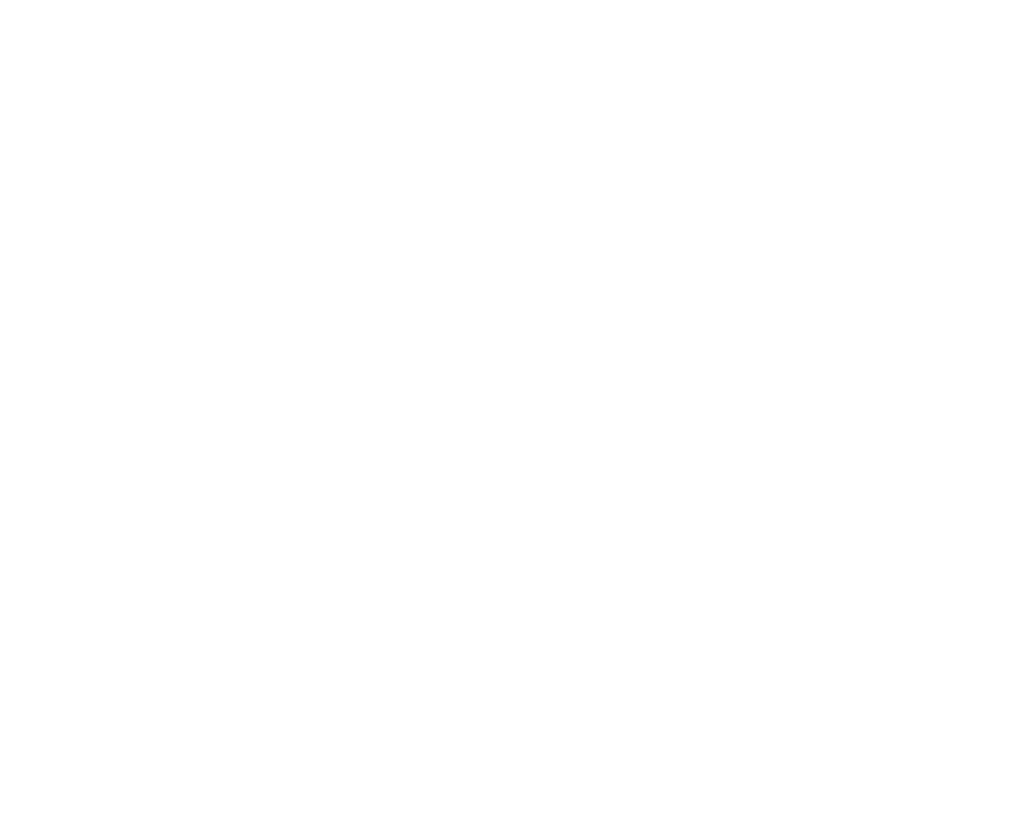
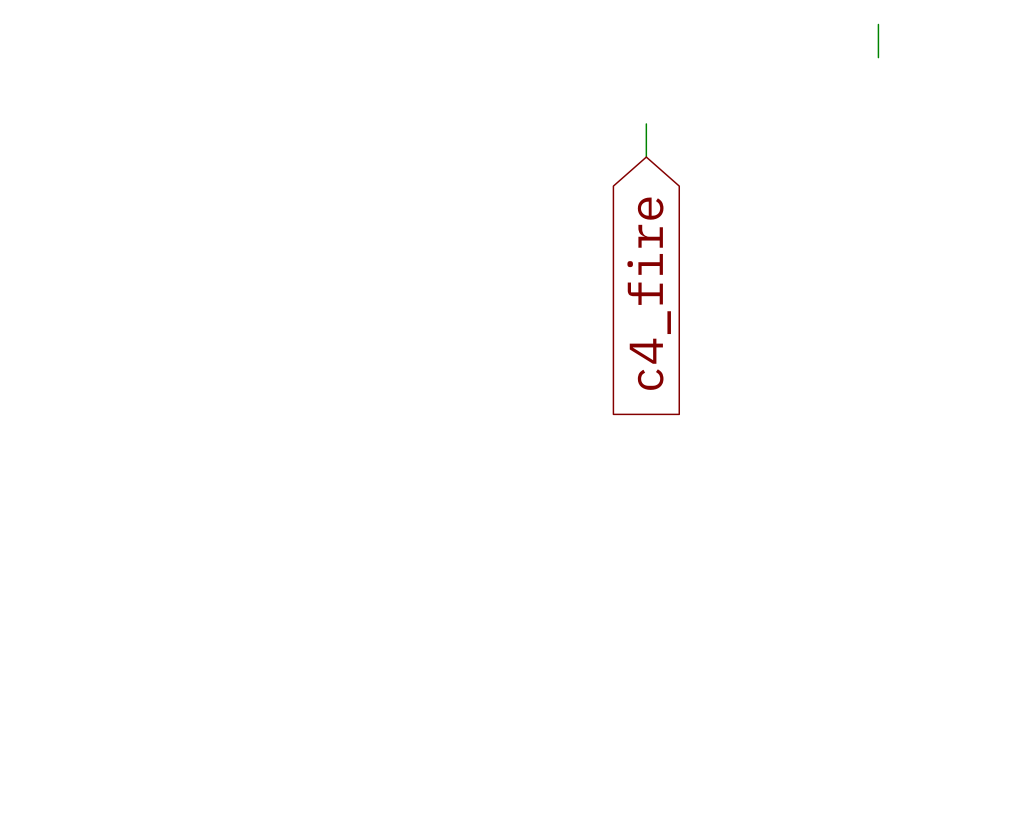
wire: none -> (878, 24) (878, 57)
wire: none -> (646, 123) (646, 157)
global label: none -> c4_fire (649, 293)

